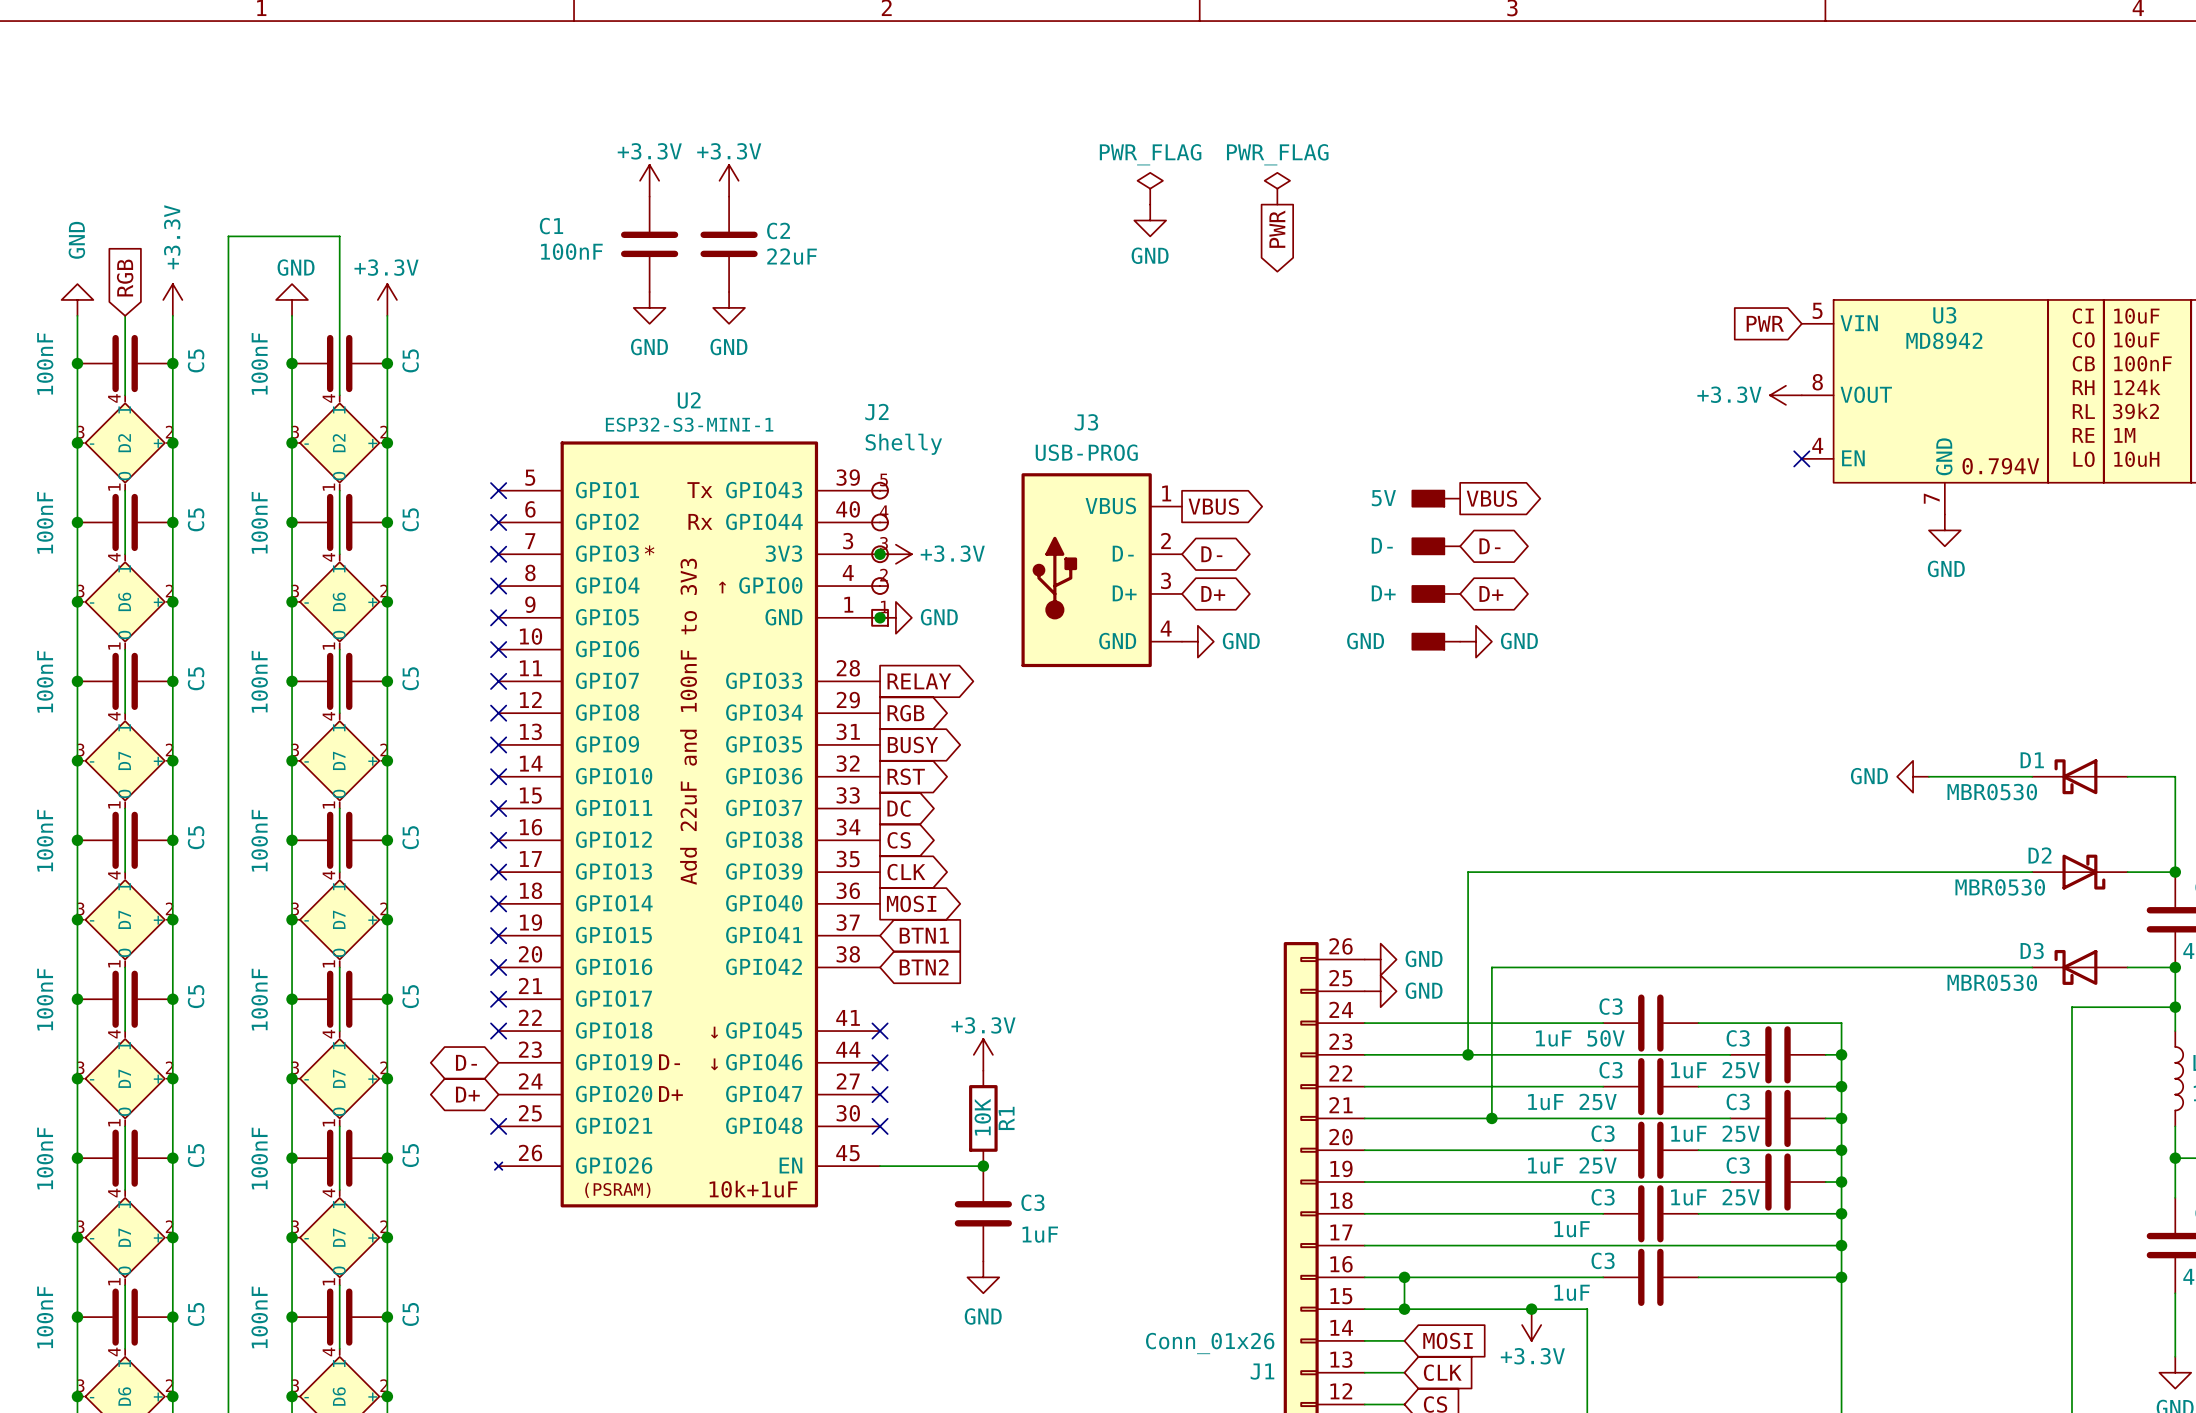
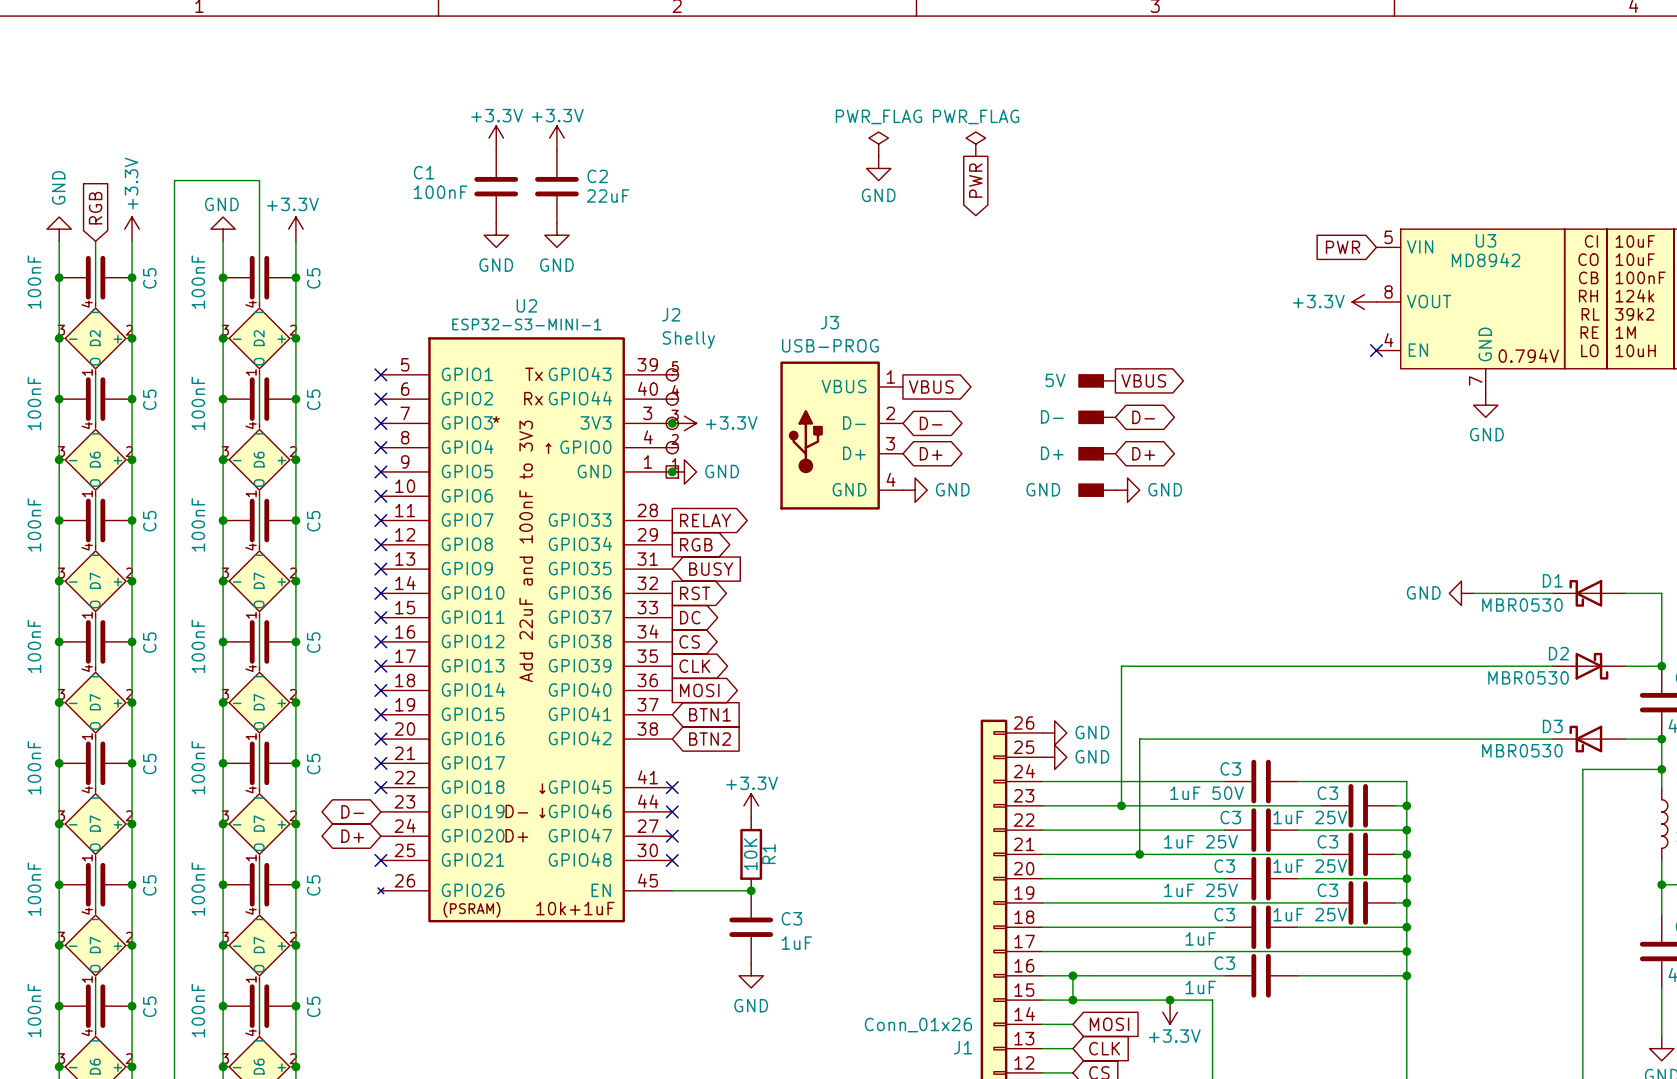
global label shape: output (912, 744) -> input (711, 569)

